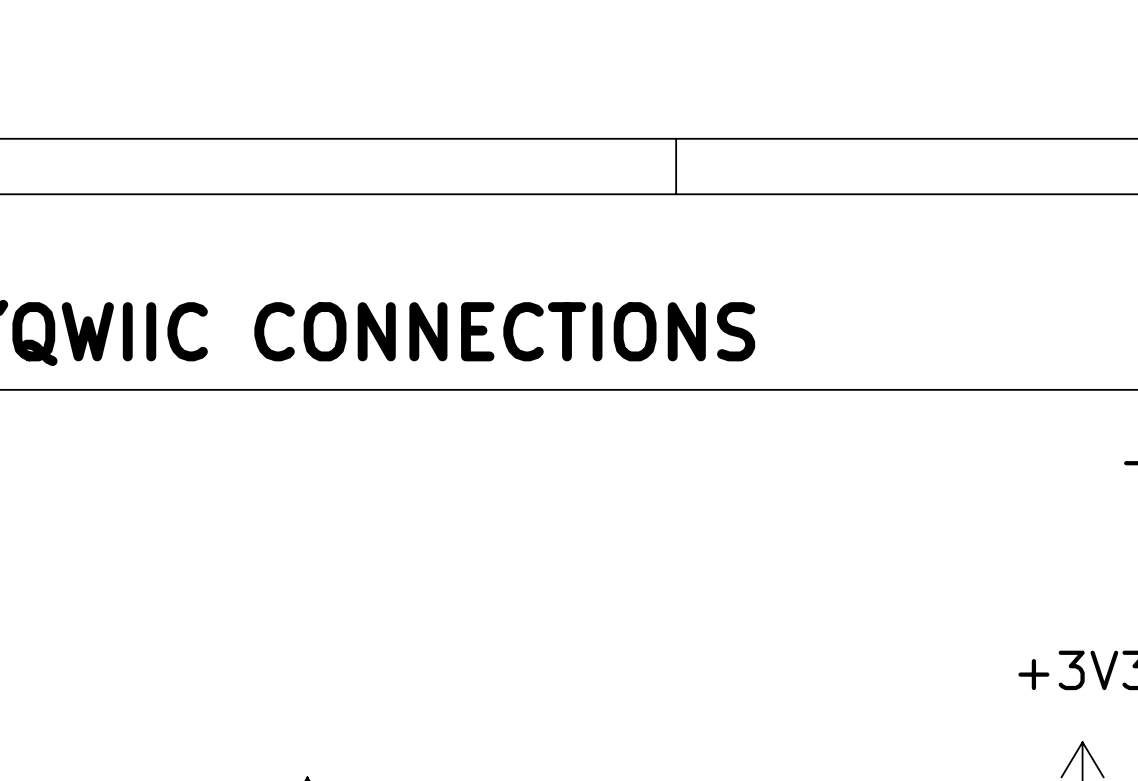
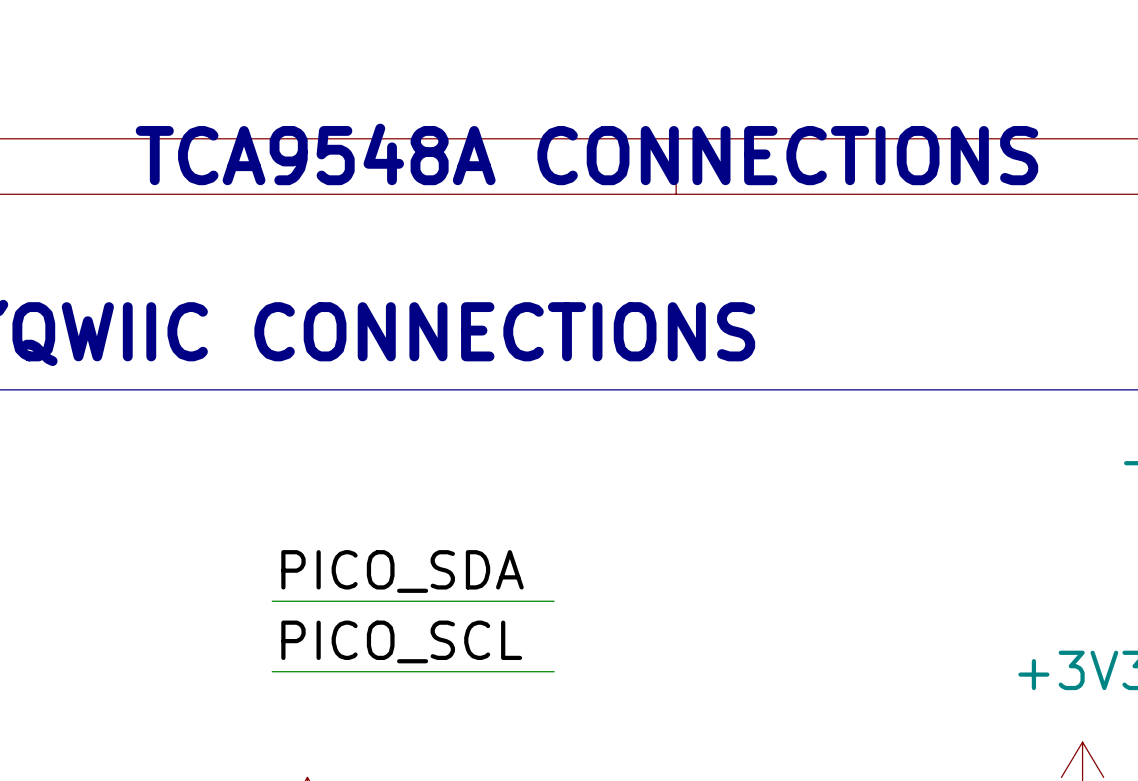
text: none -> TCA9548A CONNECTIONS (586, 154)
label: none -> PICO_SDA (402, 571)
wire: none -> (272, 601) (554, 601)
label: none -> PICO_SCL (401, 641)
wire: none -> (272, 671) (554, 671)

